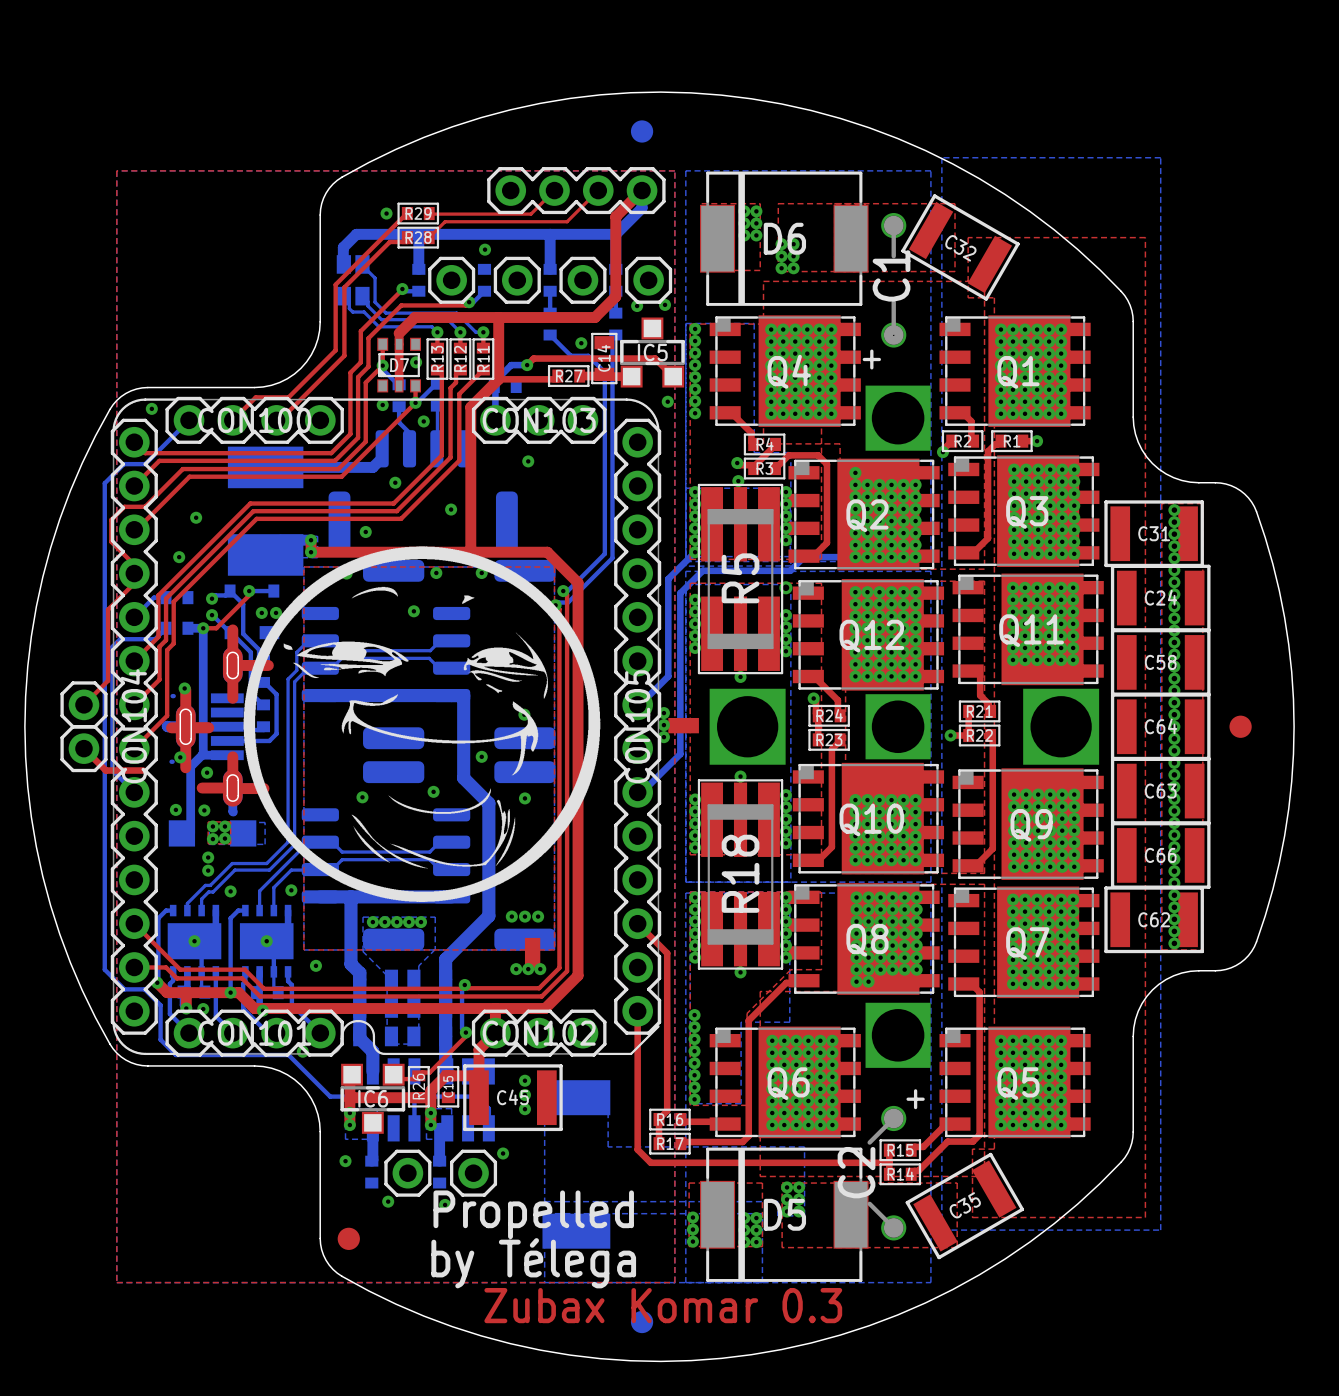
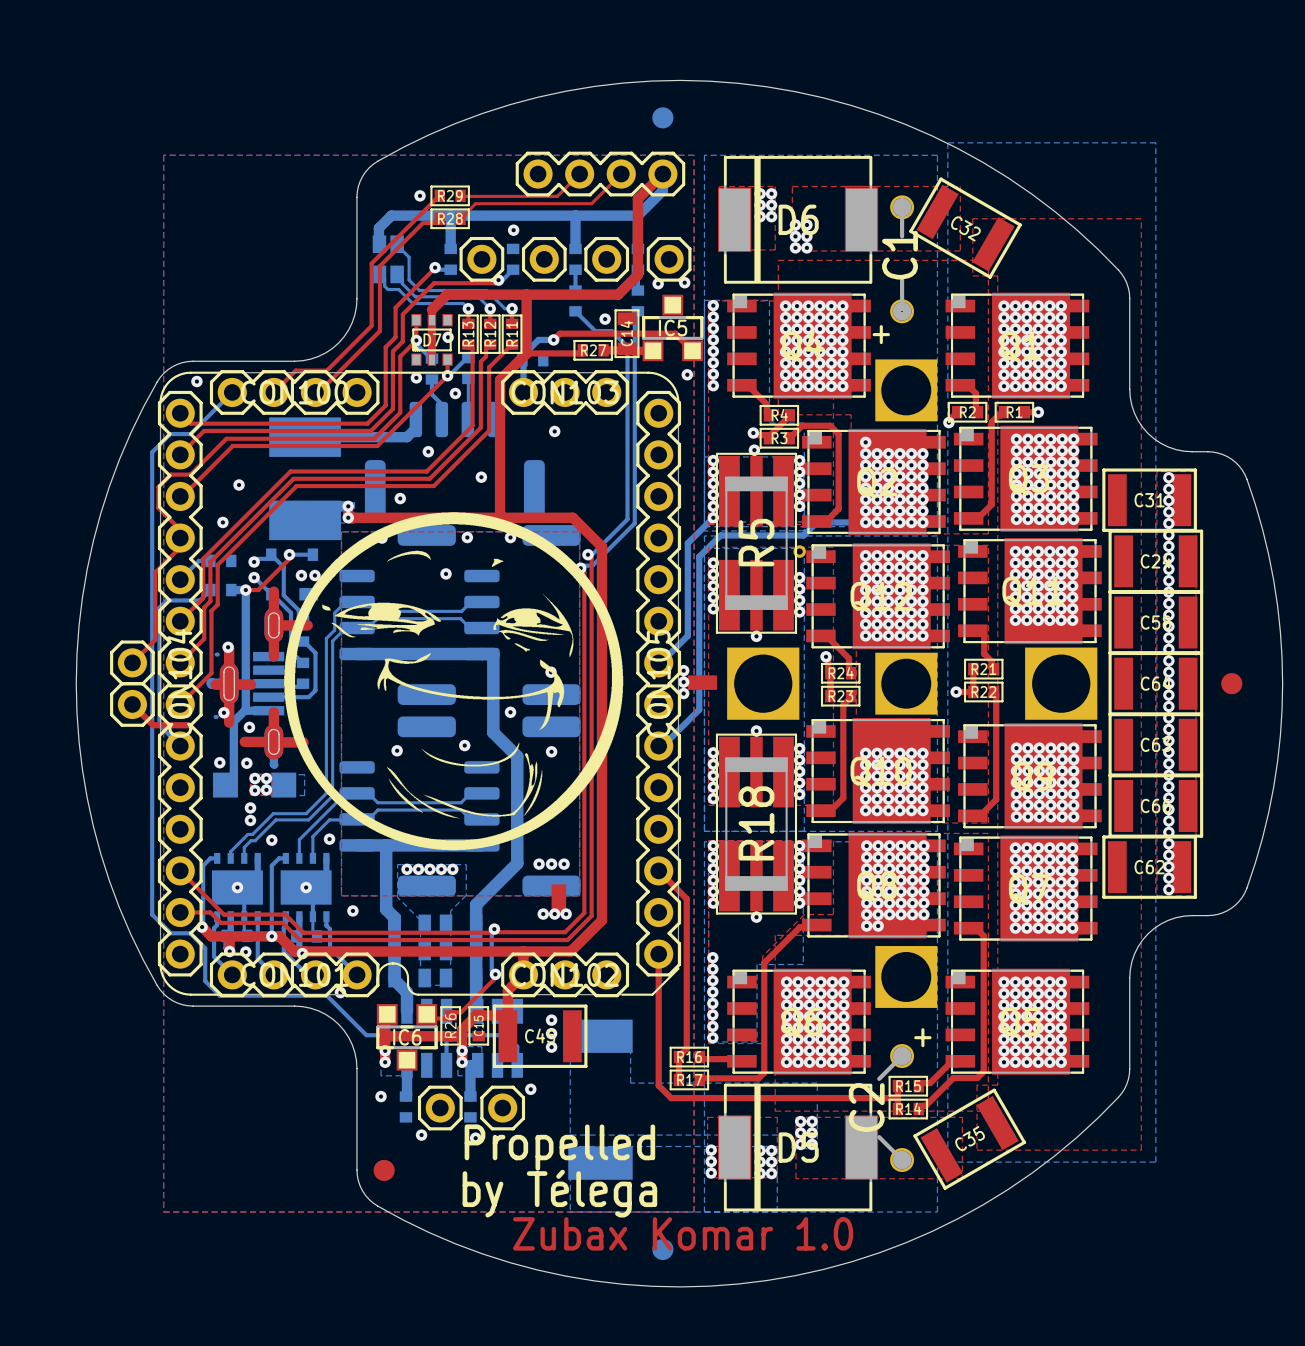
text: Zubax Komar 0.3 (663, 1305) -> Zubax Komar 1.0 (683, 1233)

